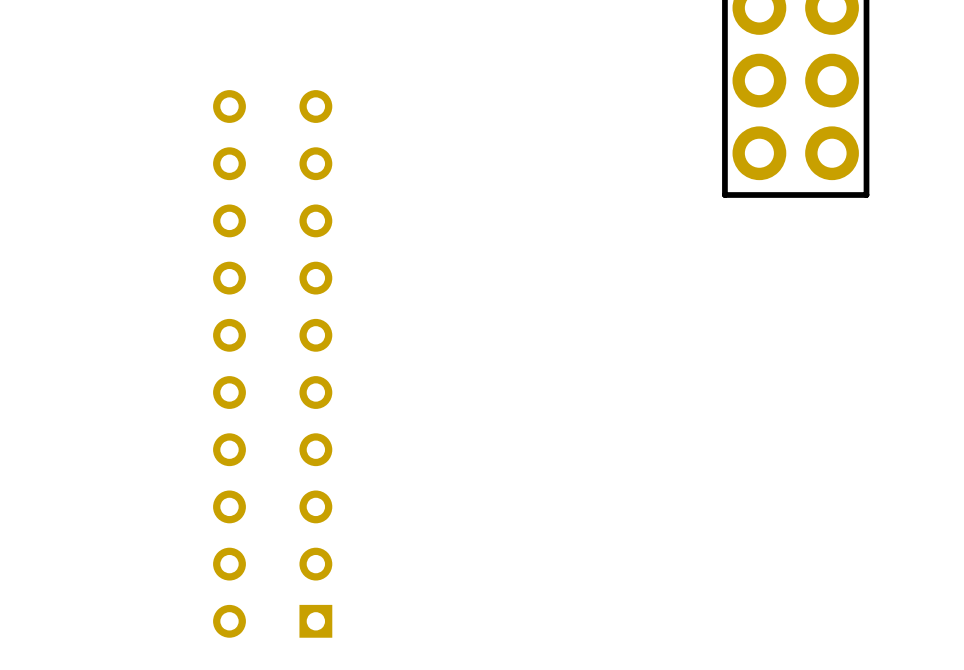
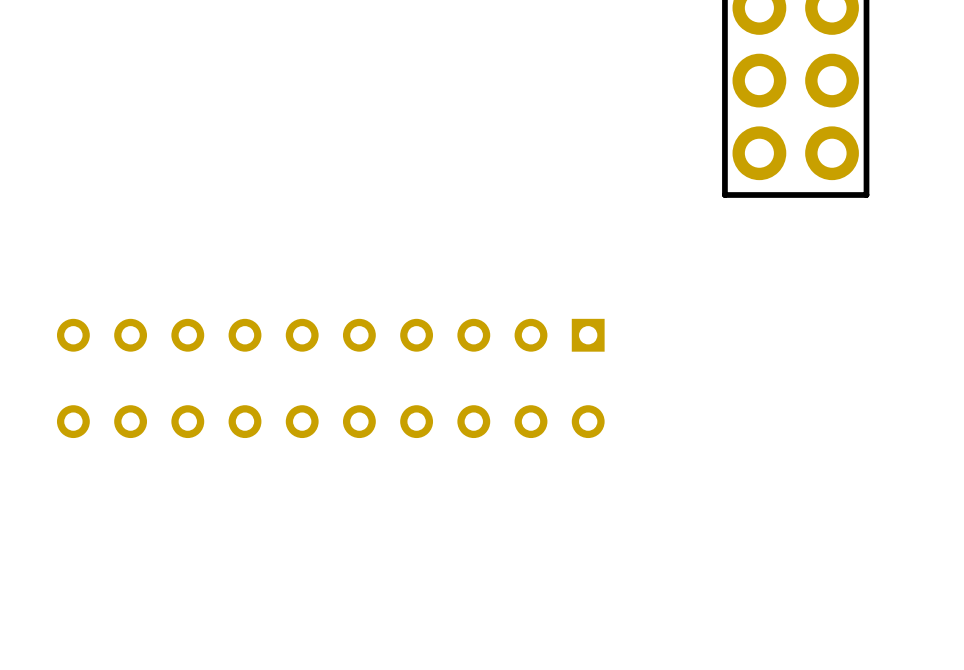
part rotation: 0° (272, 363) -> 90° counterclockwise (330, 378)

